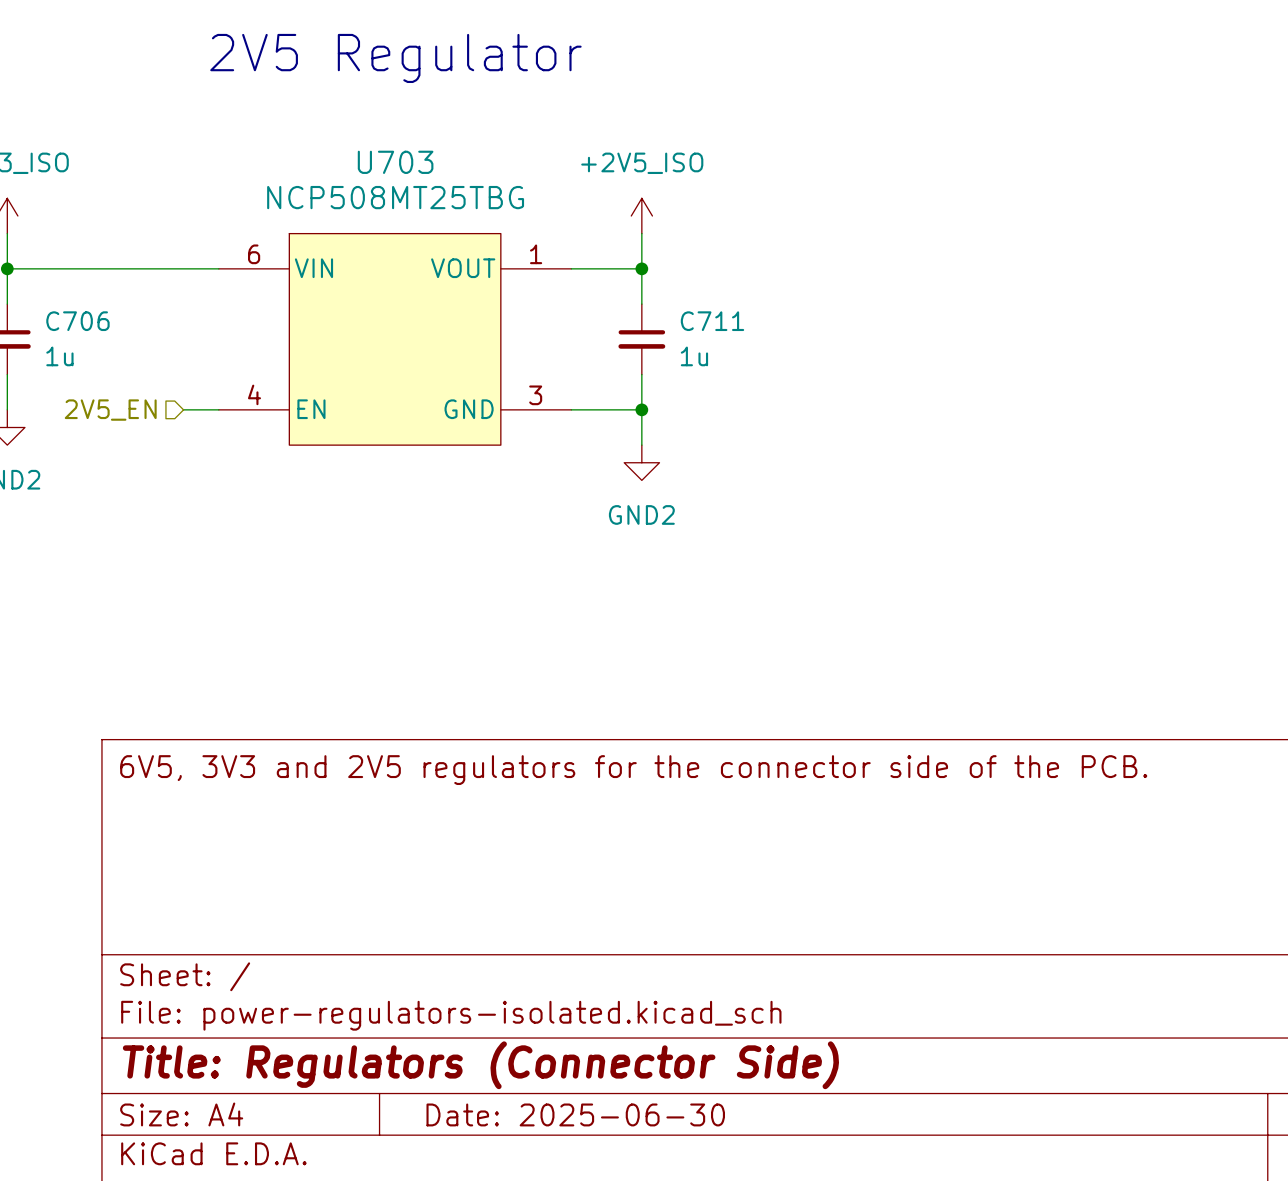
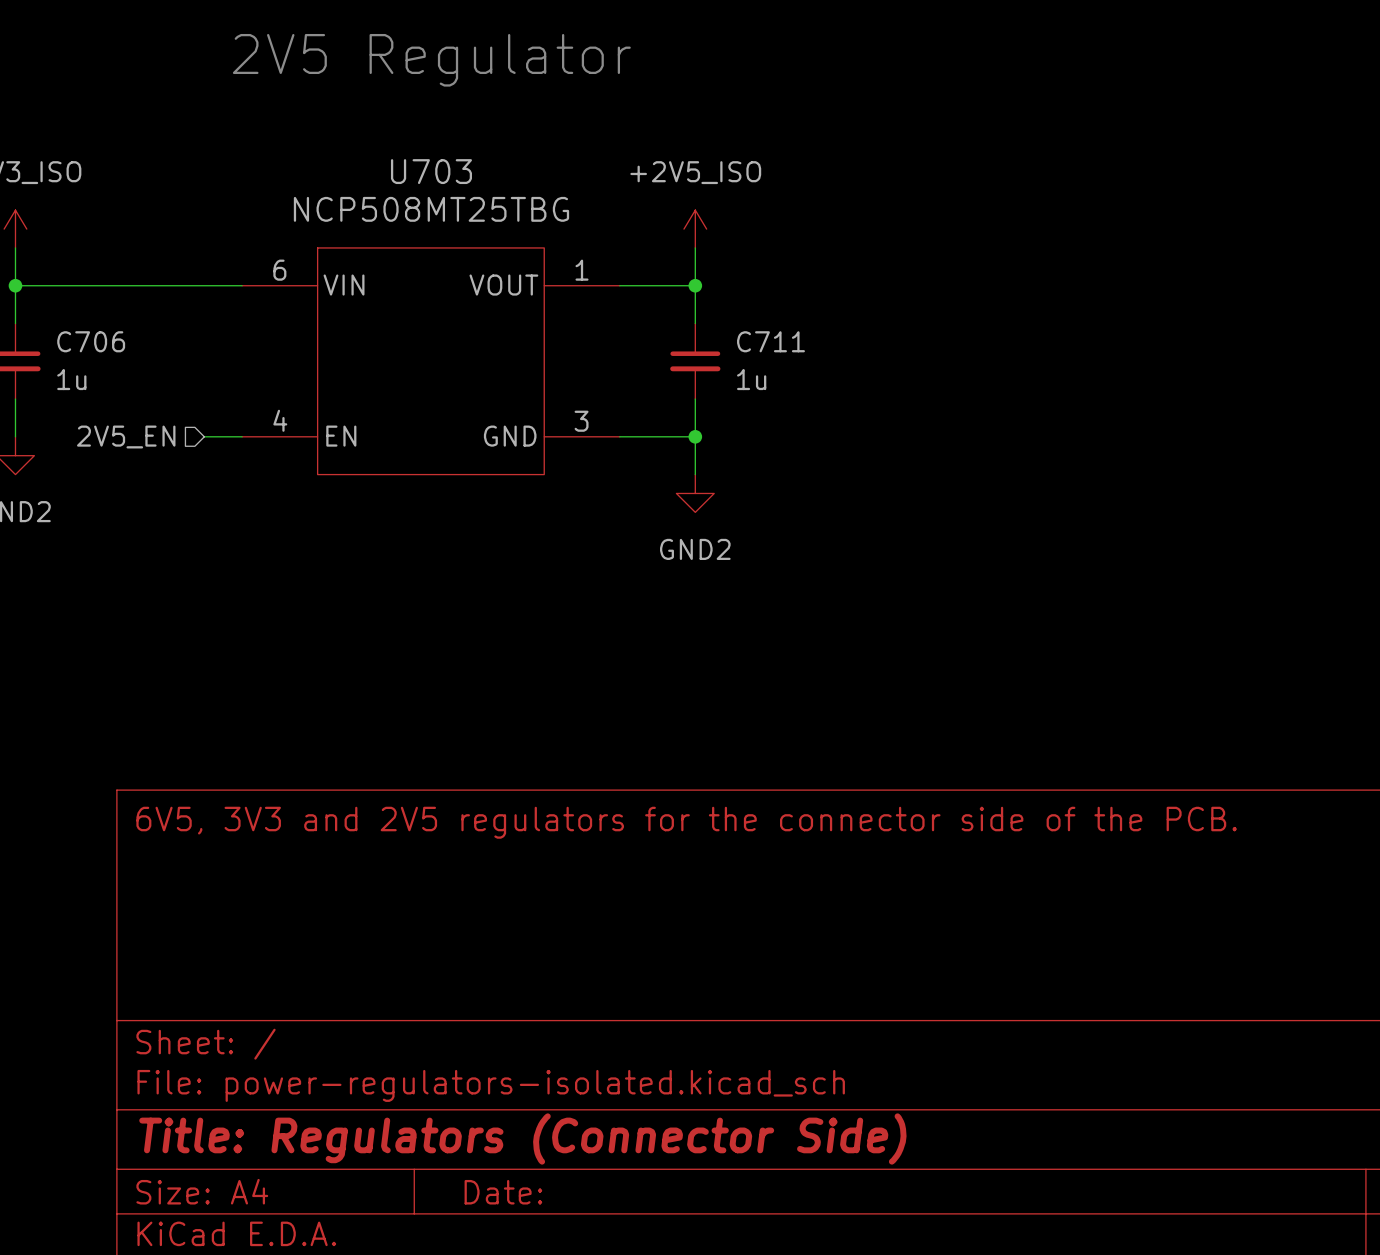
title block: Date: 2025-06-30 (575, 1114) -> Date: (503, 1192)

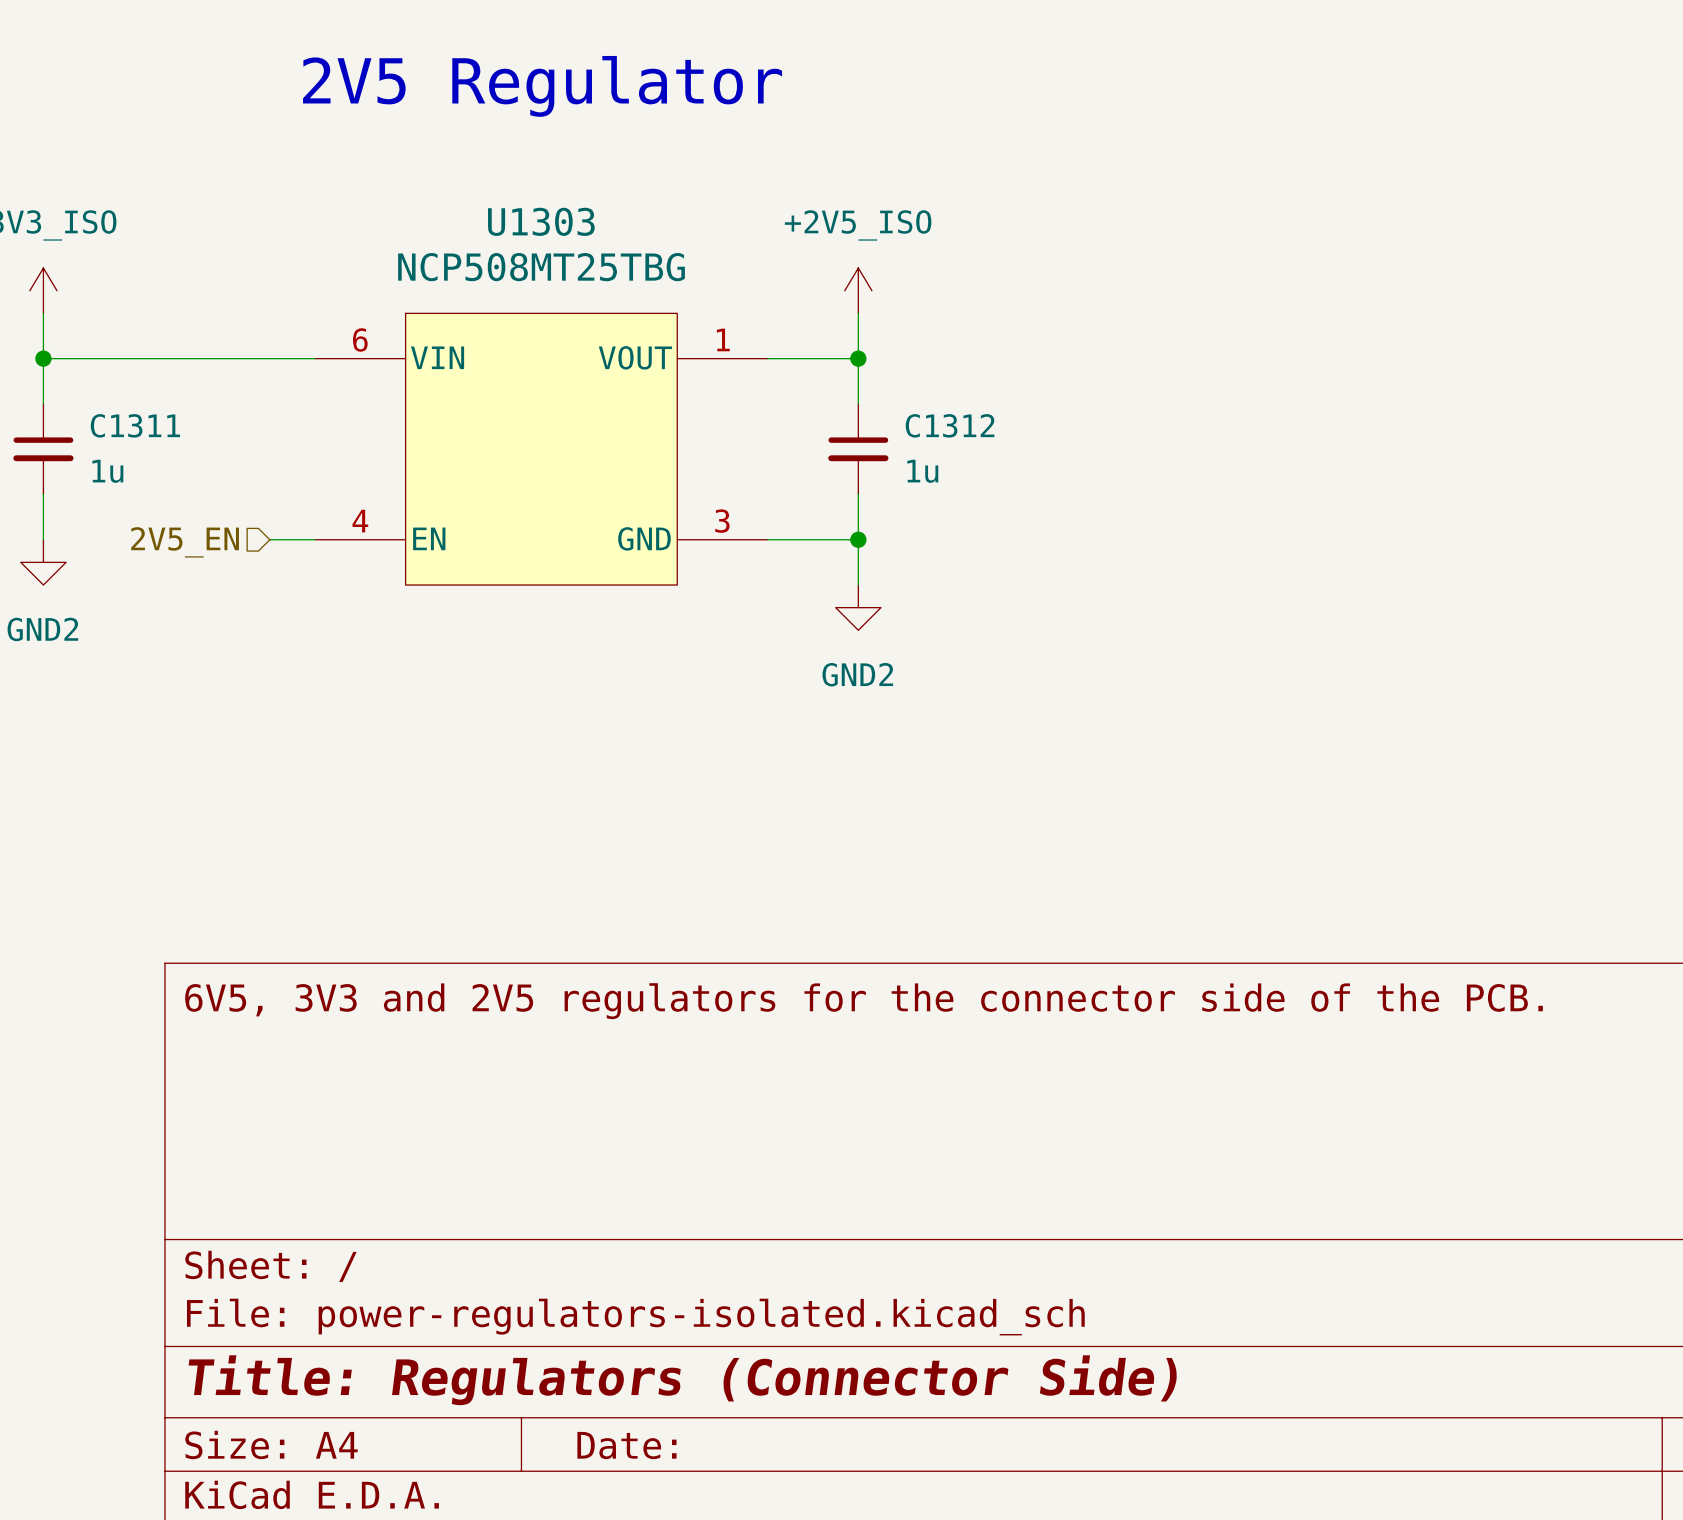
U703 name: U703 (431, 171) -> U1303 (541, 221)
C706 name: C706 (91, 341) -> C1311 (135, 425)
C711 name: C711 (770, 341) -> C1312 (950, 425)

